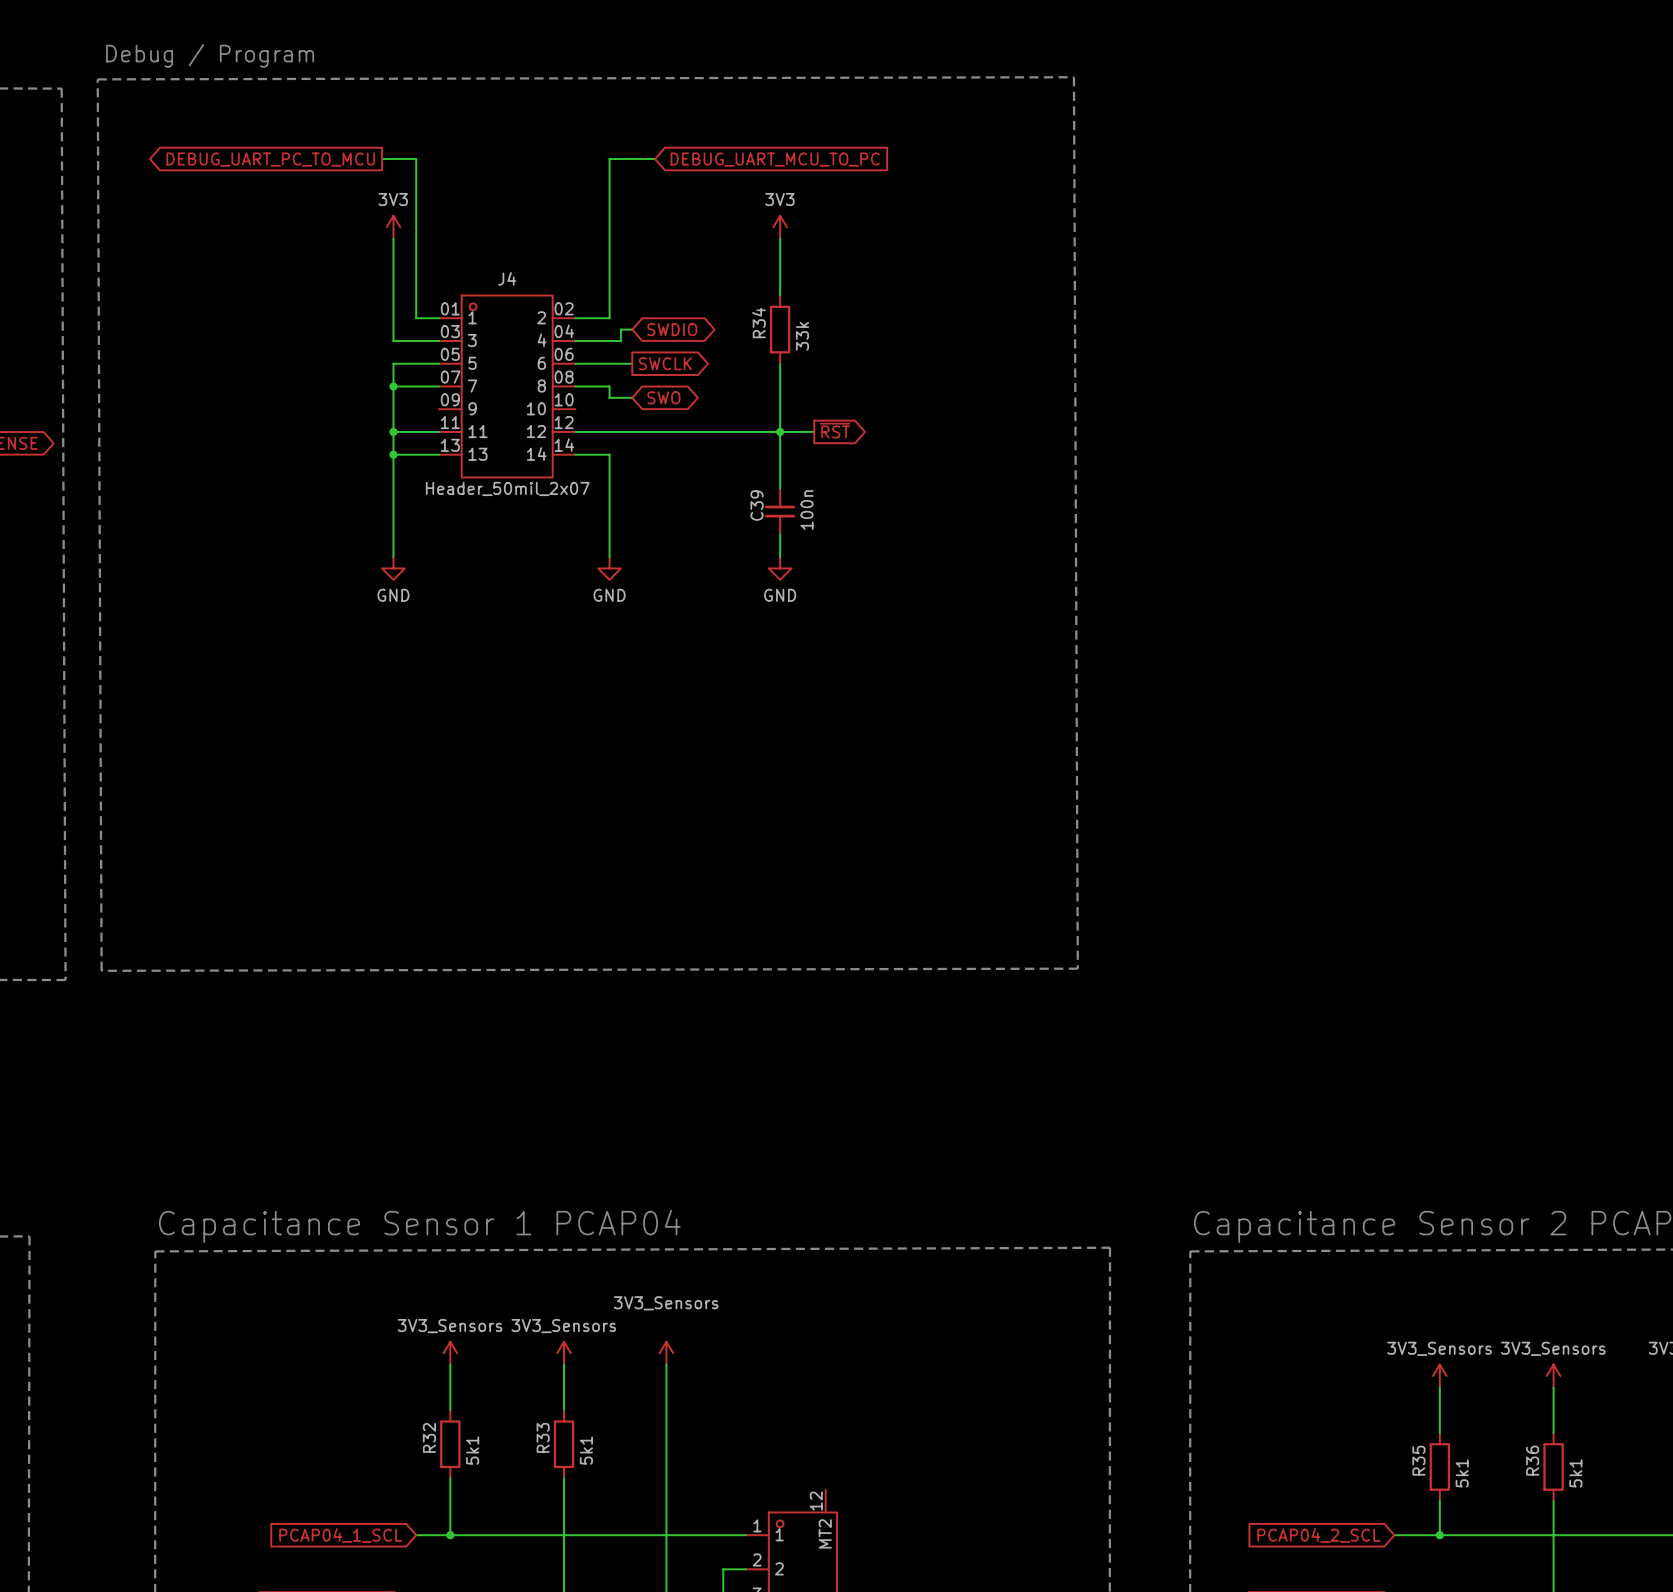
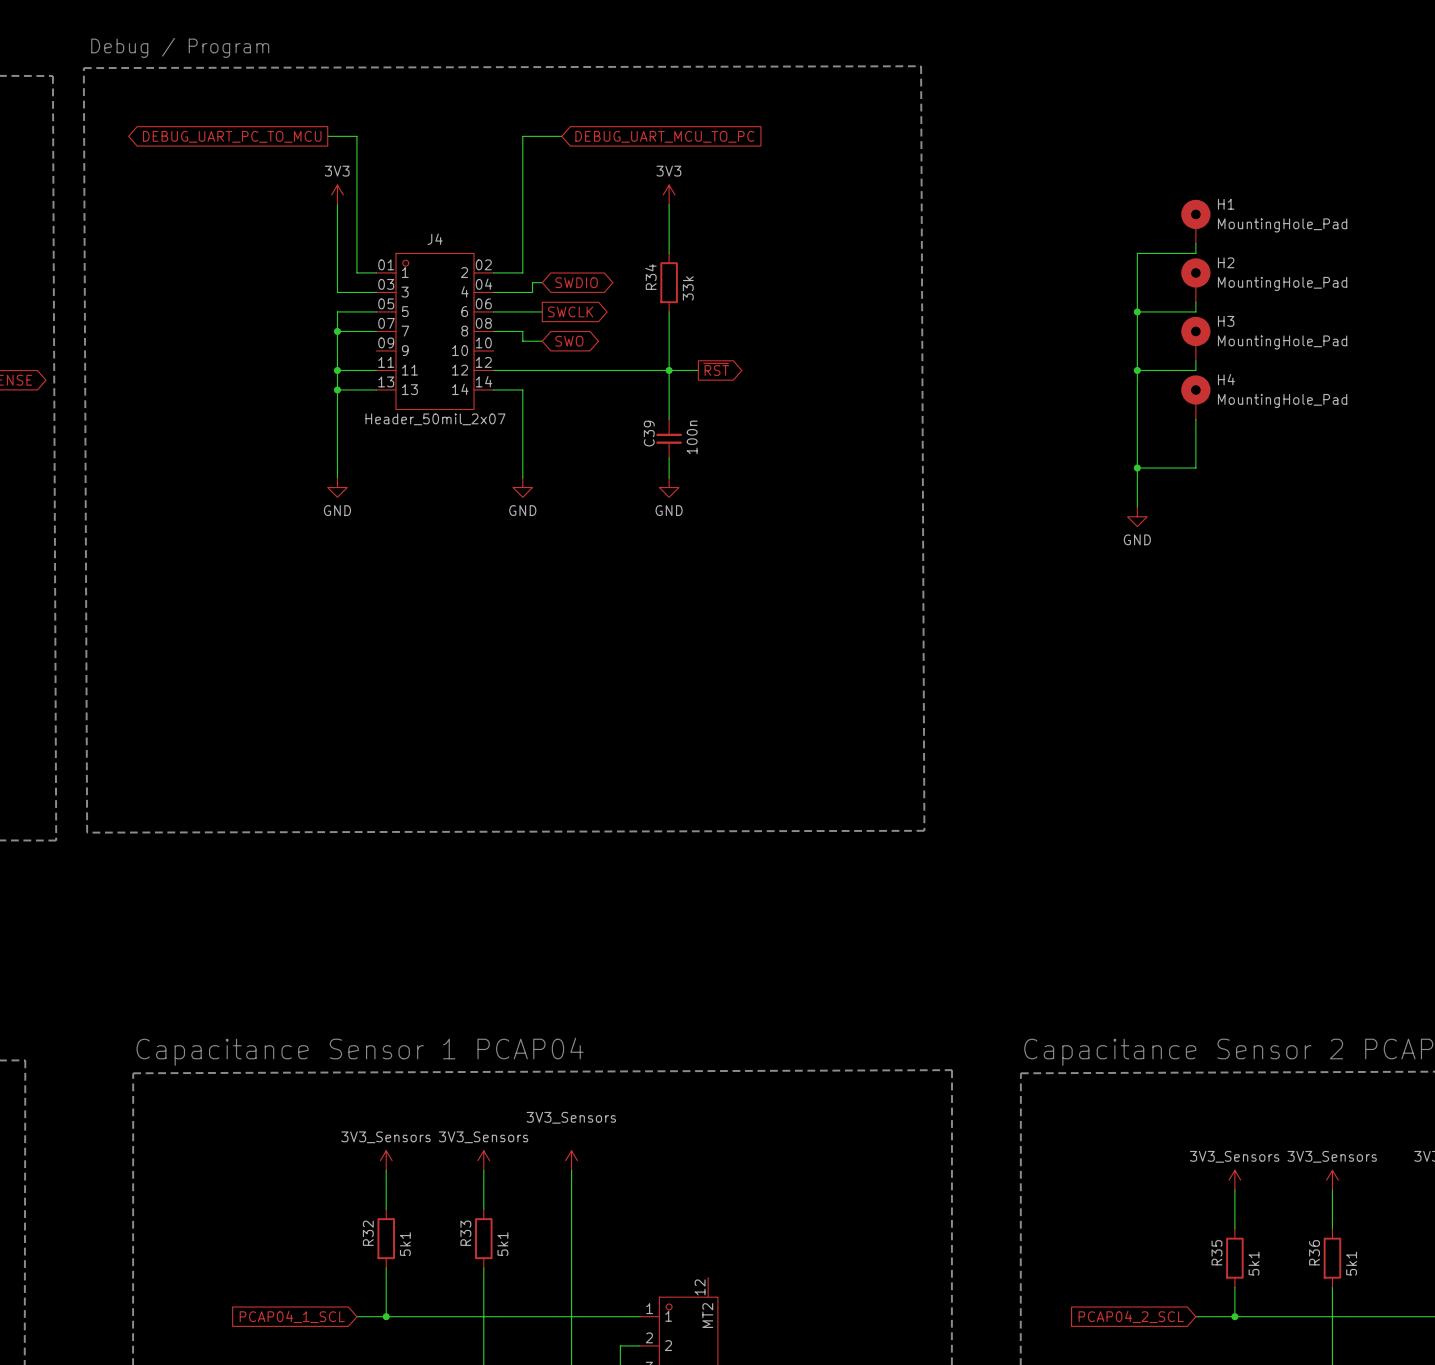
H1: none -> MountingHole_Pad (1195, 221)
wire: none -> (1195, 243) (1195, 253) (1137, 253) (1137, 507)
H2: none -> MountingHole_Pad (1195, 280)
wire: none -> (1195, 302) (1195, 311) (1137, 311)
junction: none -> (1137, 311)
H3: none -> MountingHole_Pad (1195, 338)
wire: none -> (1195, 360) (1195, 370) (1137, 370)
junction: none -> (1137, 370)
H4: none -> MountingHole_Pad (1195, 397)
wire: none -> (1195, 419) (1195, 468) (1137, 468)
junction: none -> (1137, 468)
power symbol: none -> GND (1137, 516)

